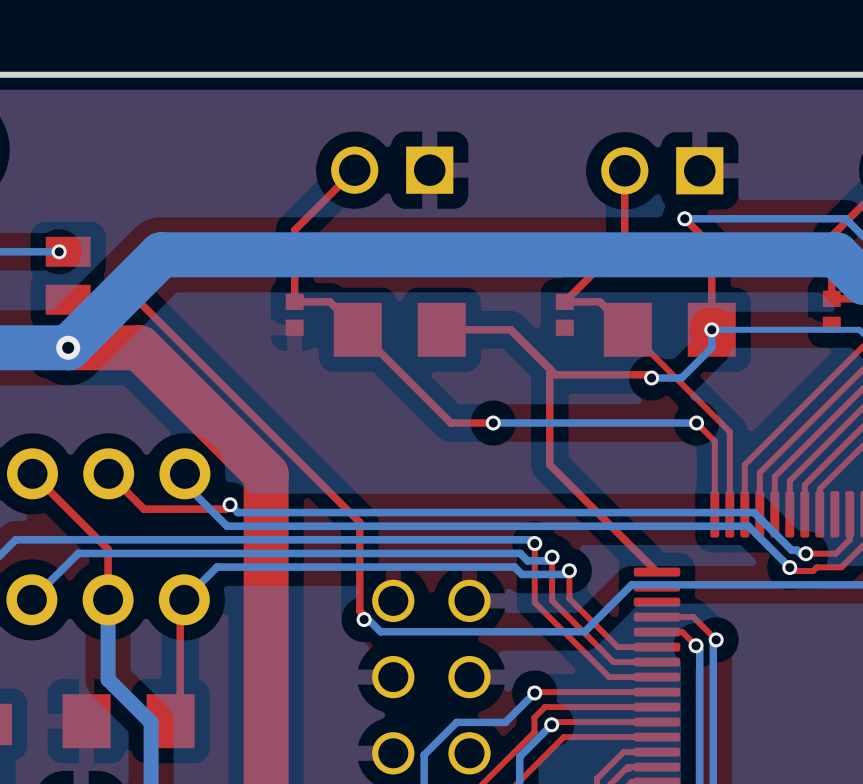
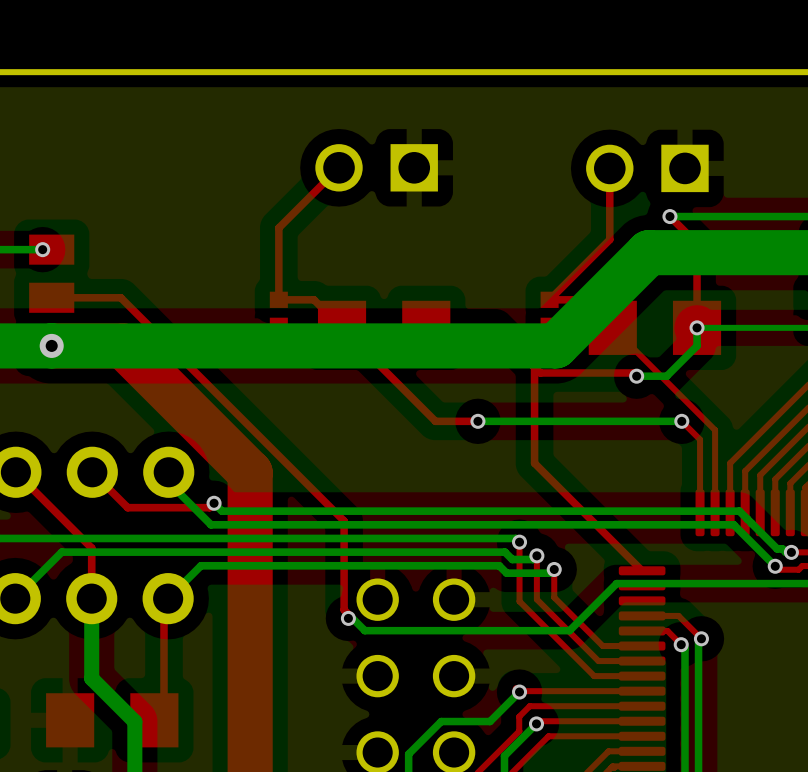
bottom track: (663, 254) (161, 254) (68, 347) -> (648, 252) (555, 345) (51, 345)

